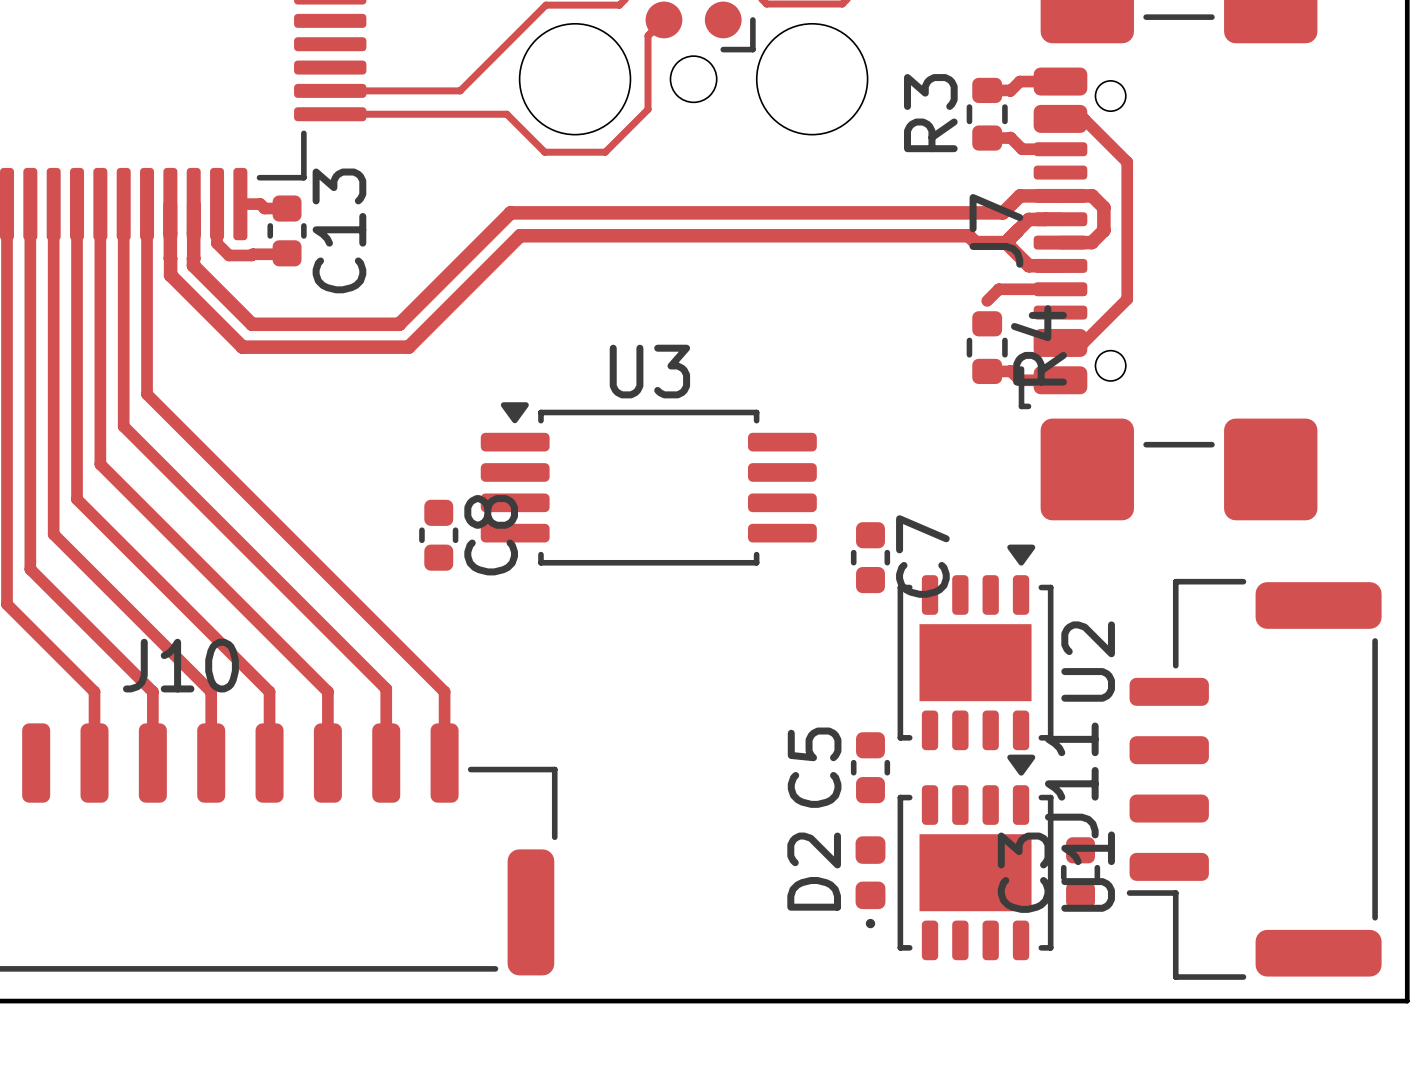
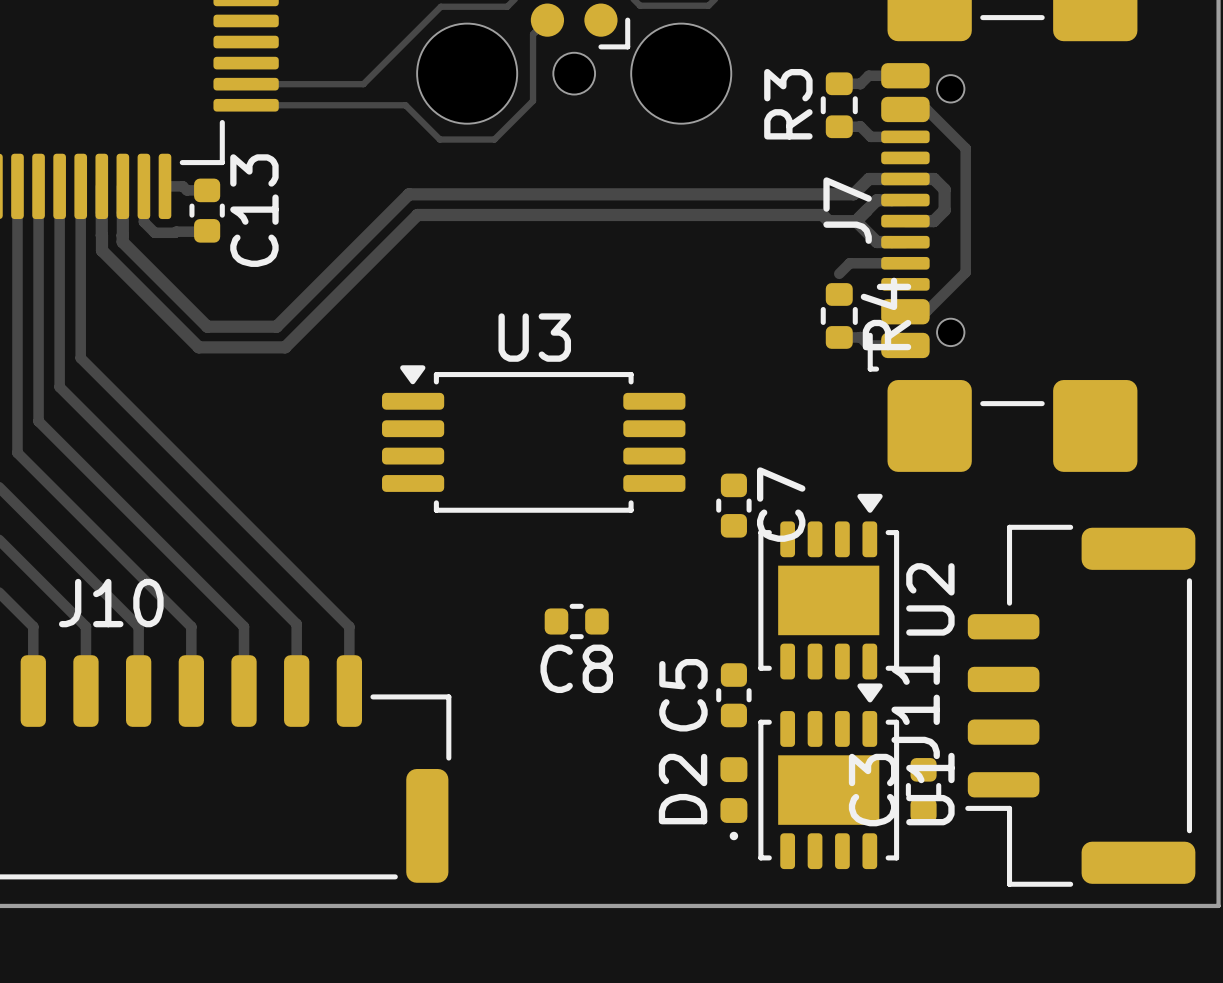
track: (252, 324) (399, 324) -> (175, 294) (207, 326) (276, 326) (308, 294)
track: (242, 347) (408, 347) -> (166, 315) (198, 347) (285, 347) (316, 315)
C8 rotation: 0° (438, 535) -> 90° clockwise (576, 621)
C8 position: (438, 535) -> (576, 621)

